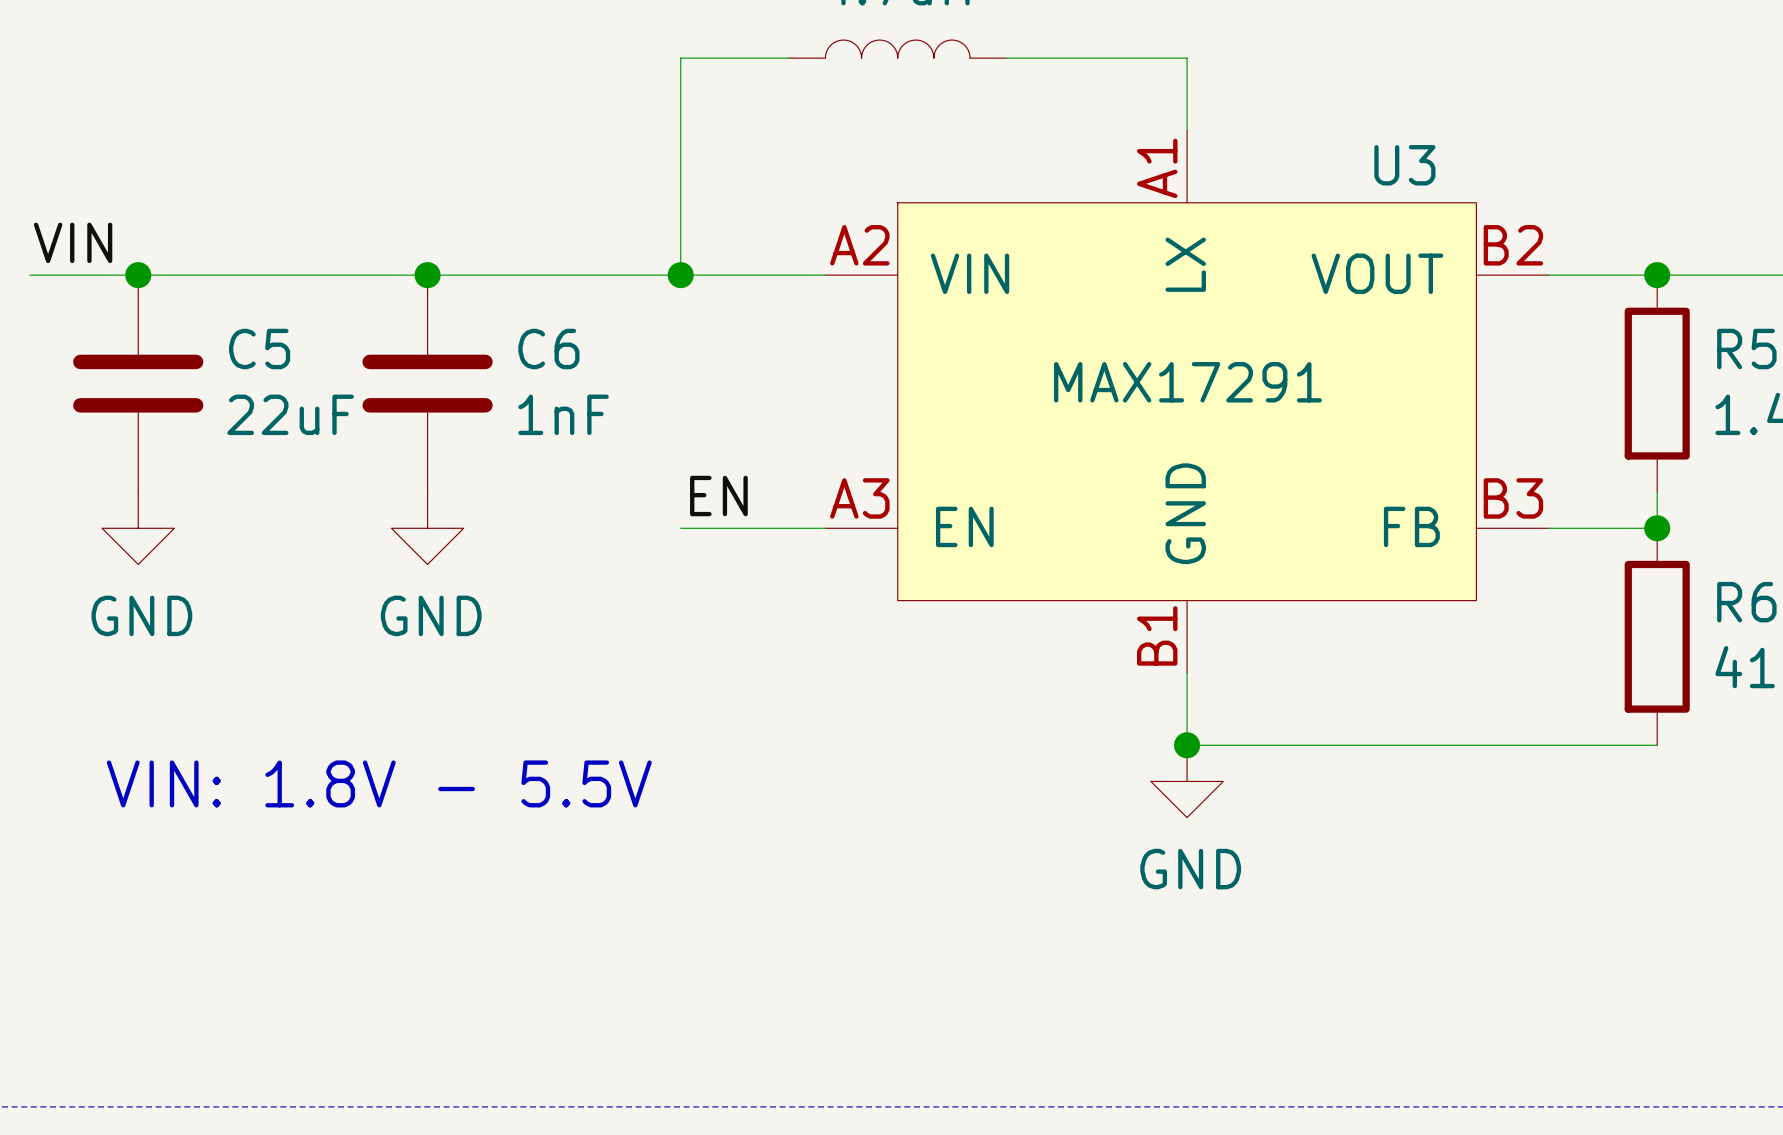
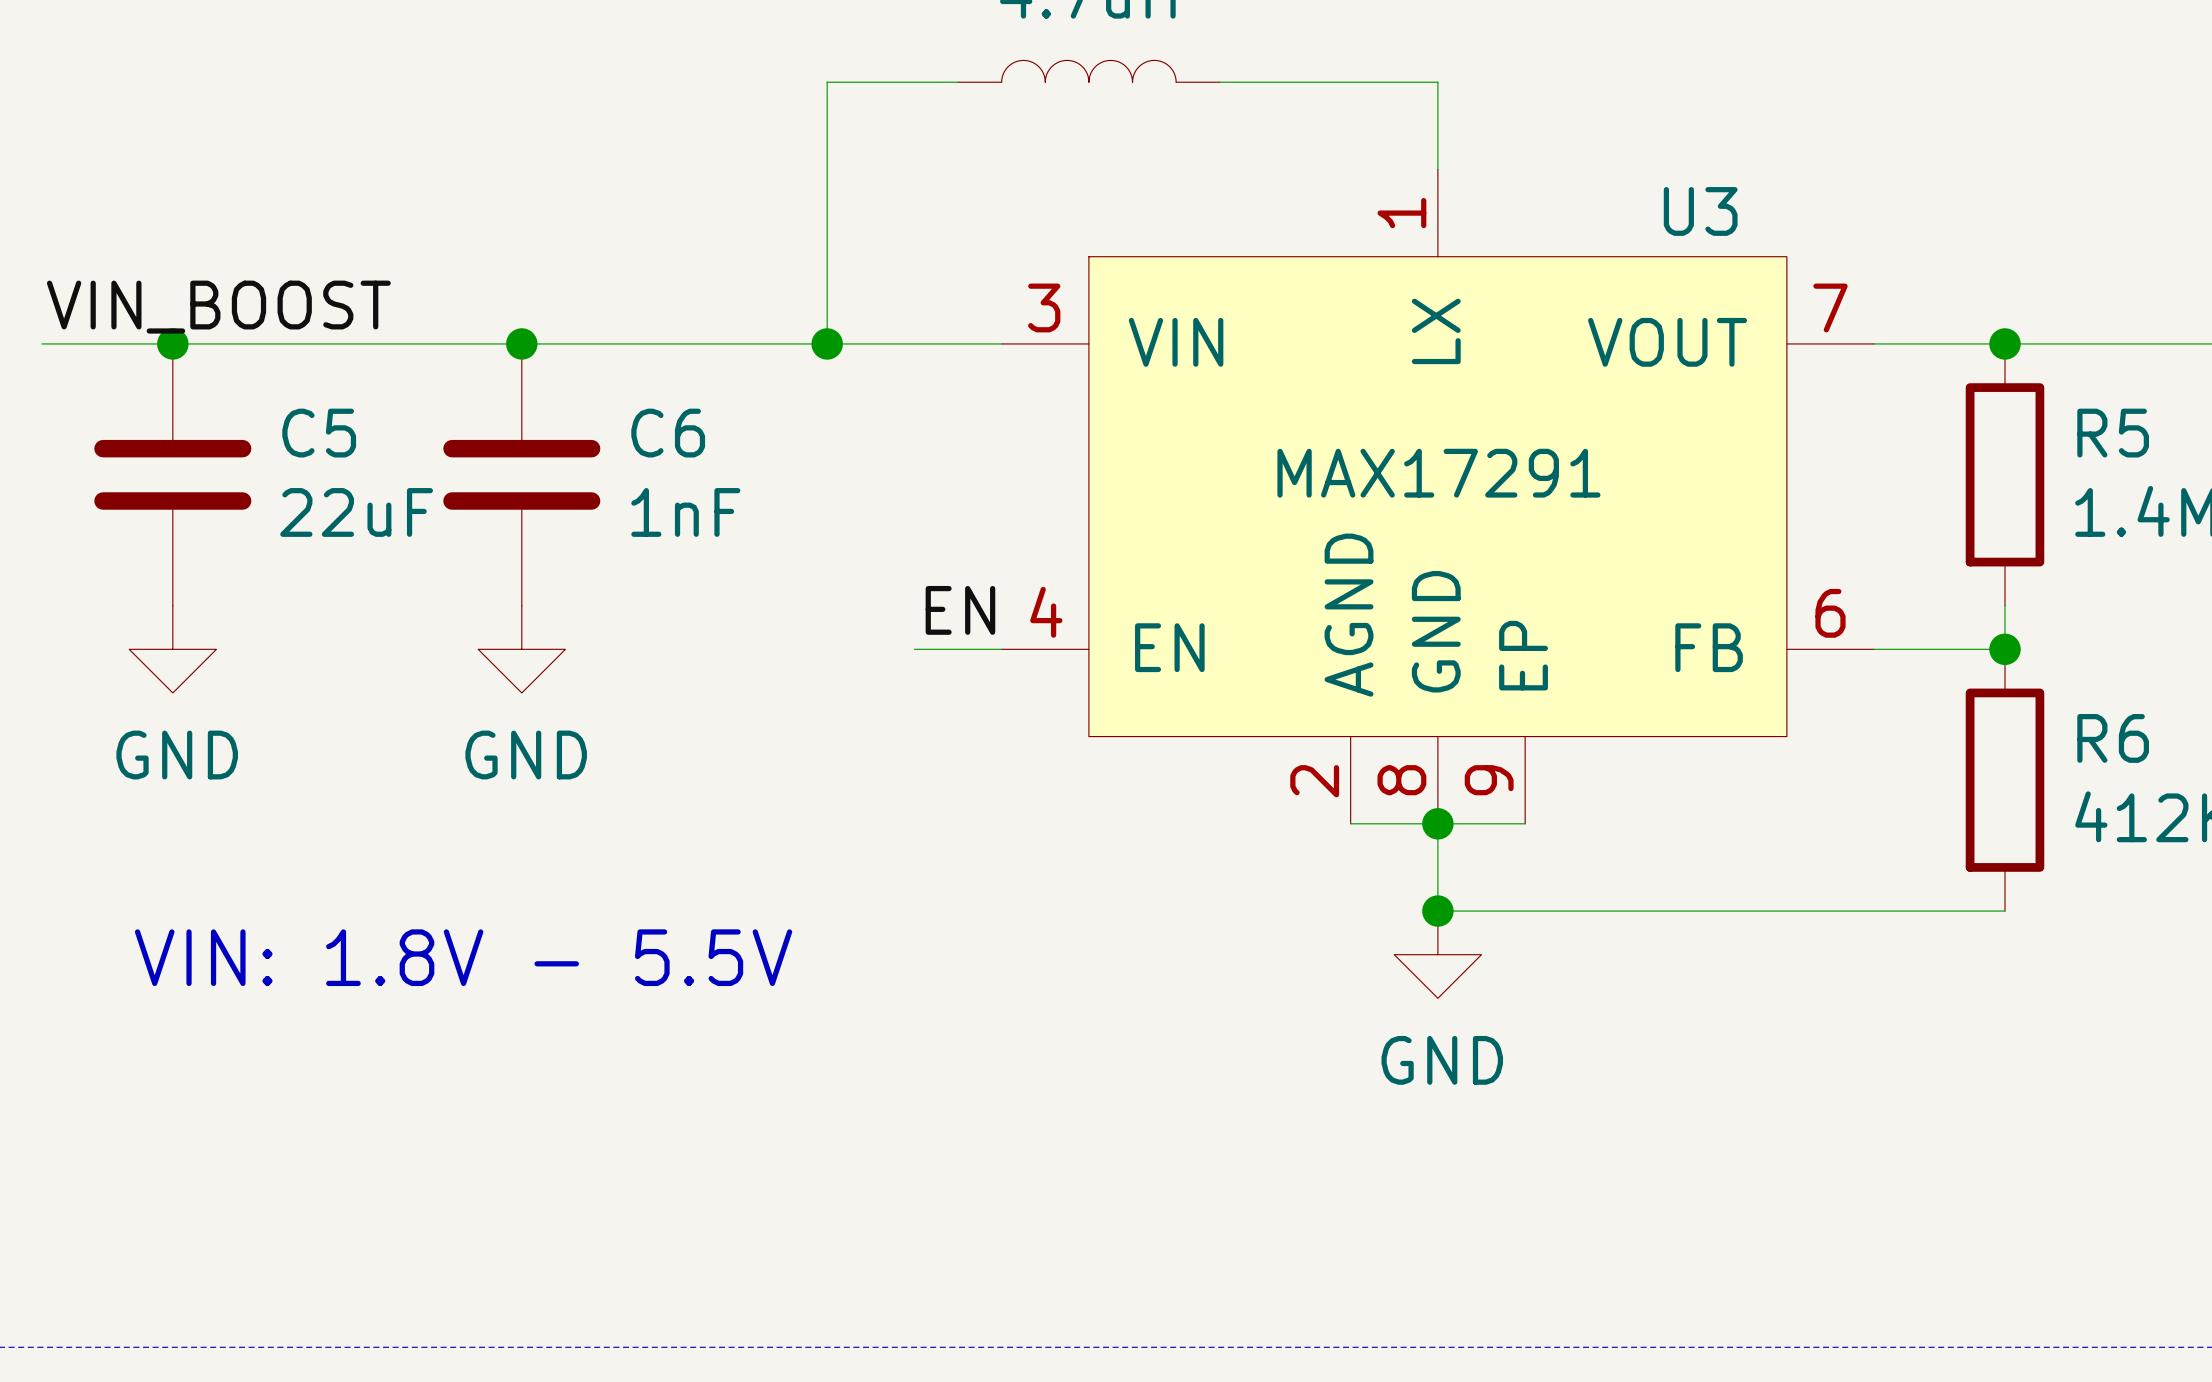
U3 symbol: [825, 130, 1549, 673] -> [1001, 169, 1875, 824]
label: VIN (73, 242) -> VIN_BOOST (218, 307)
label position: EN (718, 496) -> EN (960, 610)
wire: (680, 528) (753, 528) -> none
wire: none -> (1350, 823) (1525, 823)
junction: none -> (1437, 823)

